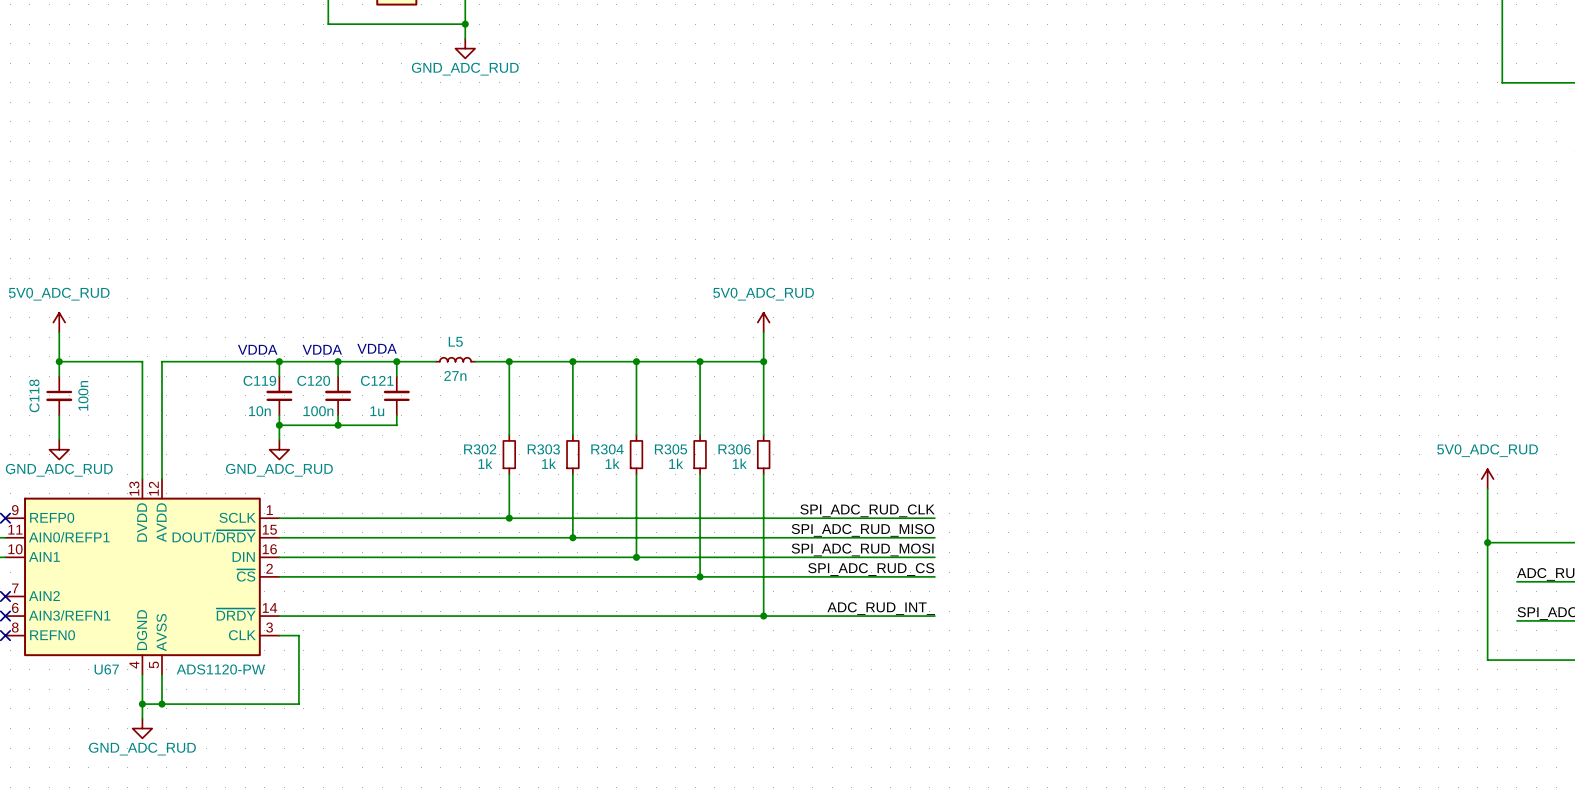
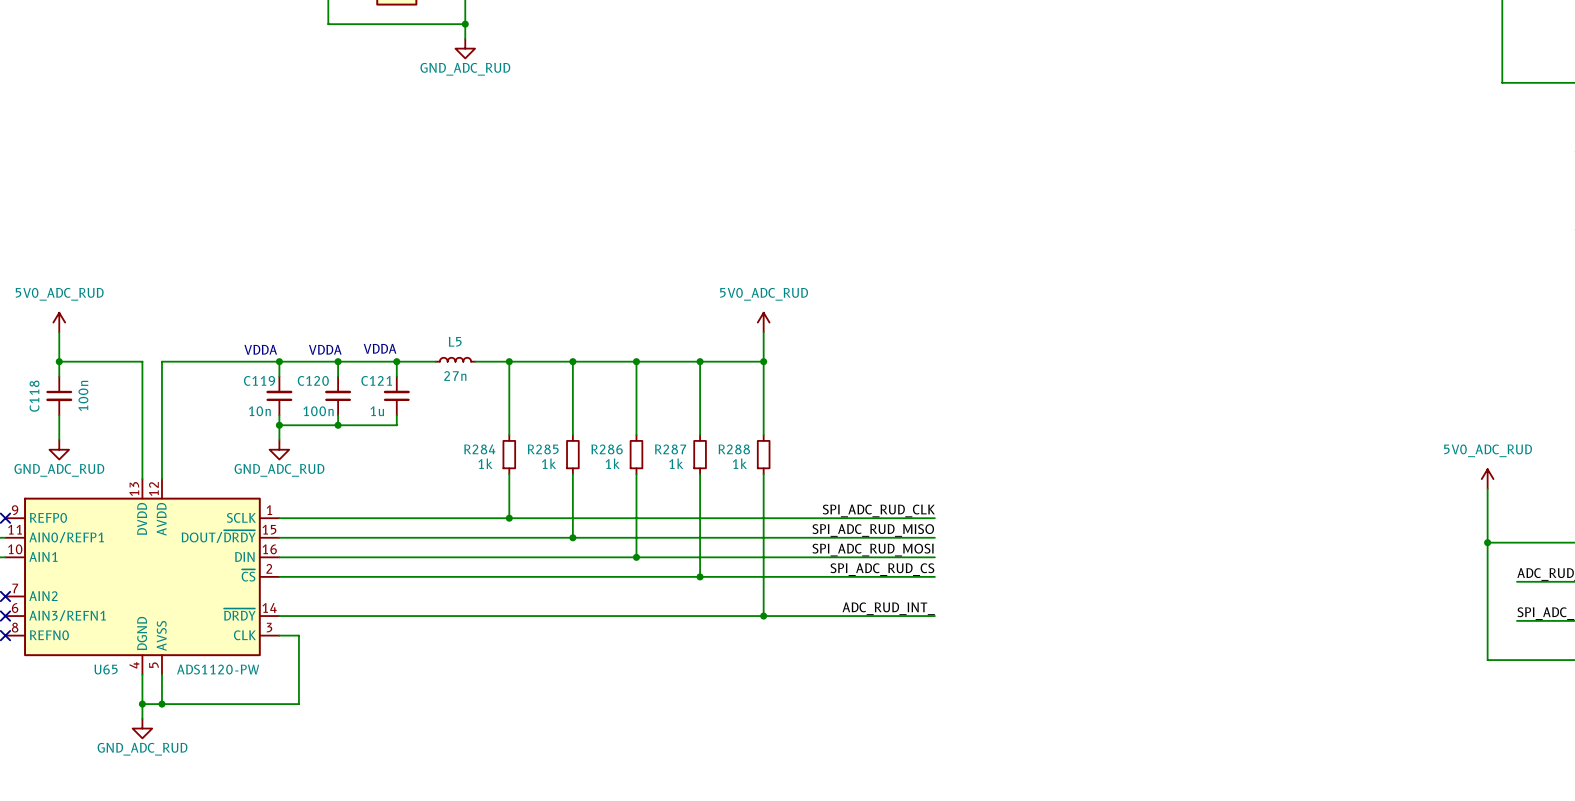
R302 name: R302 (480, 449) -> R284 (479, 449)
R303 name: R303 (543, 449) -> R285 (543, 449)
R304 name: R304 (607, 449) -> R286 (607, 449)
R305 name: R305 (671, 449) -> R287 (670, 449)
R306 name: R306 (734, 449) -> R288 (734, 449)
U67 name: U67 (106, 669) -> U65 (106, 669)

